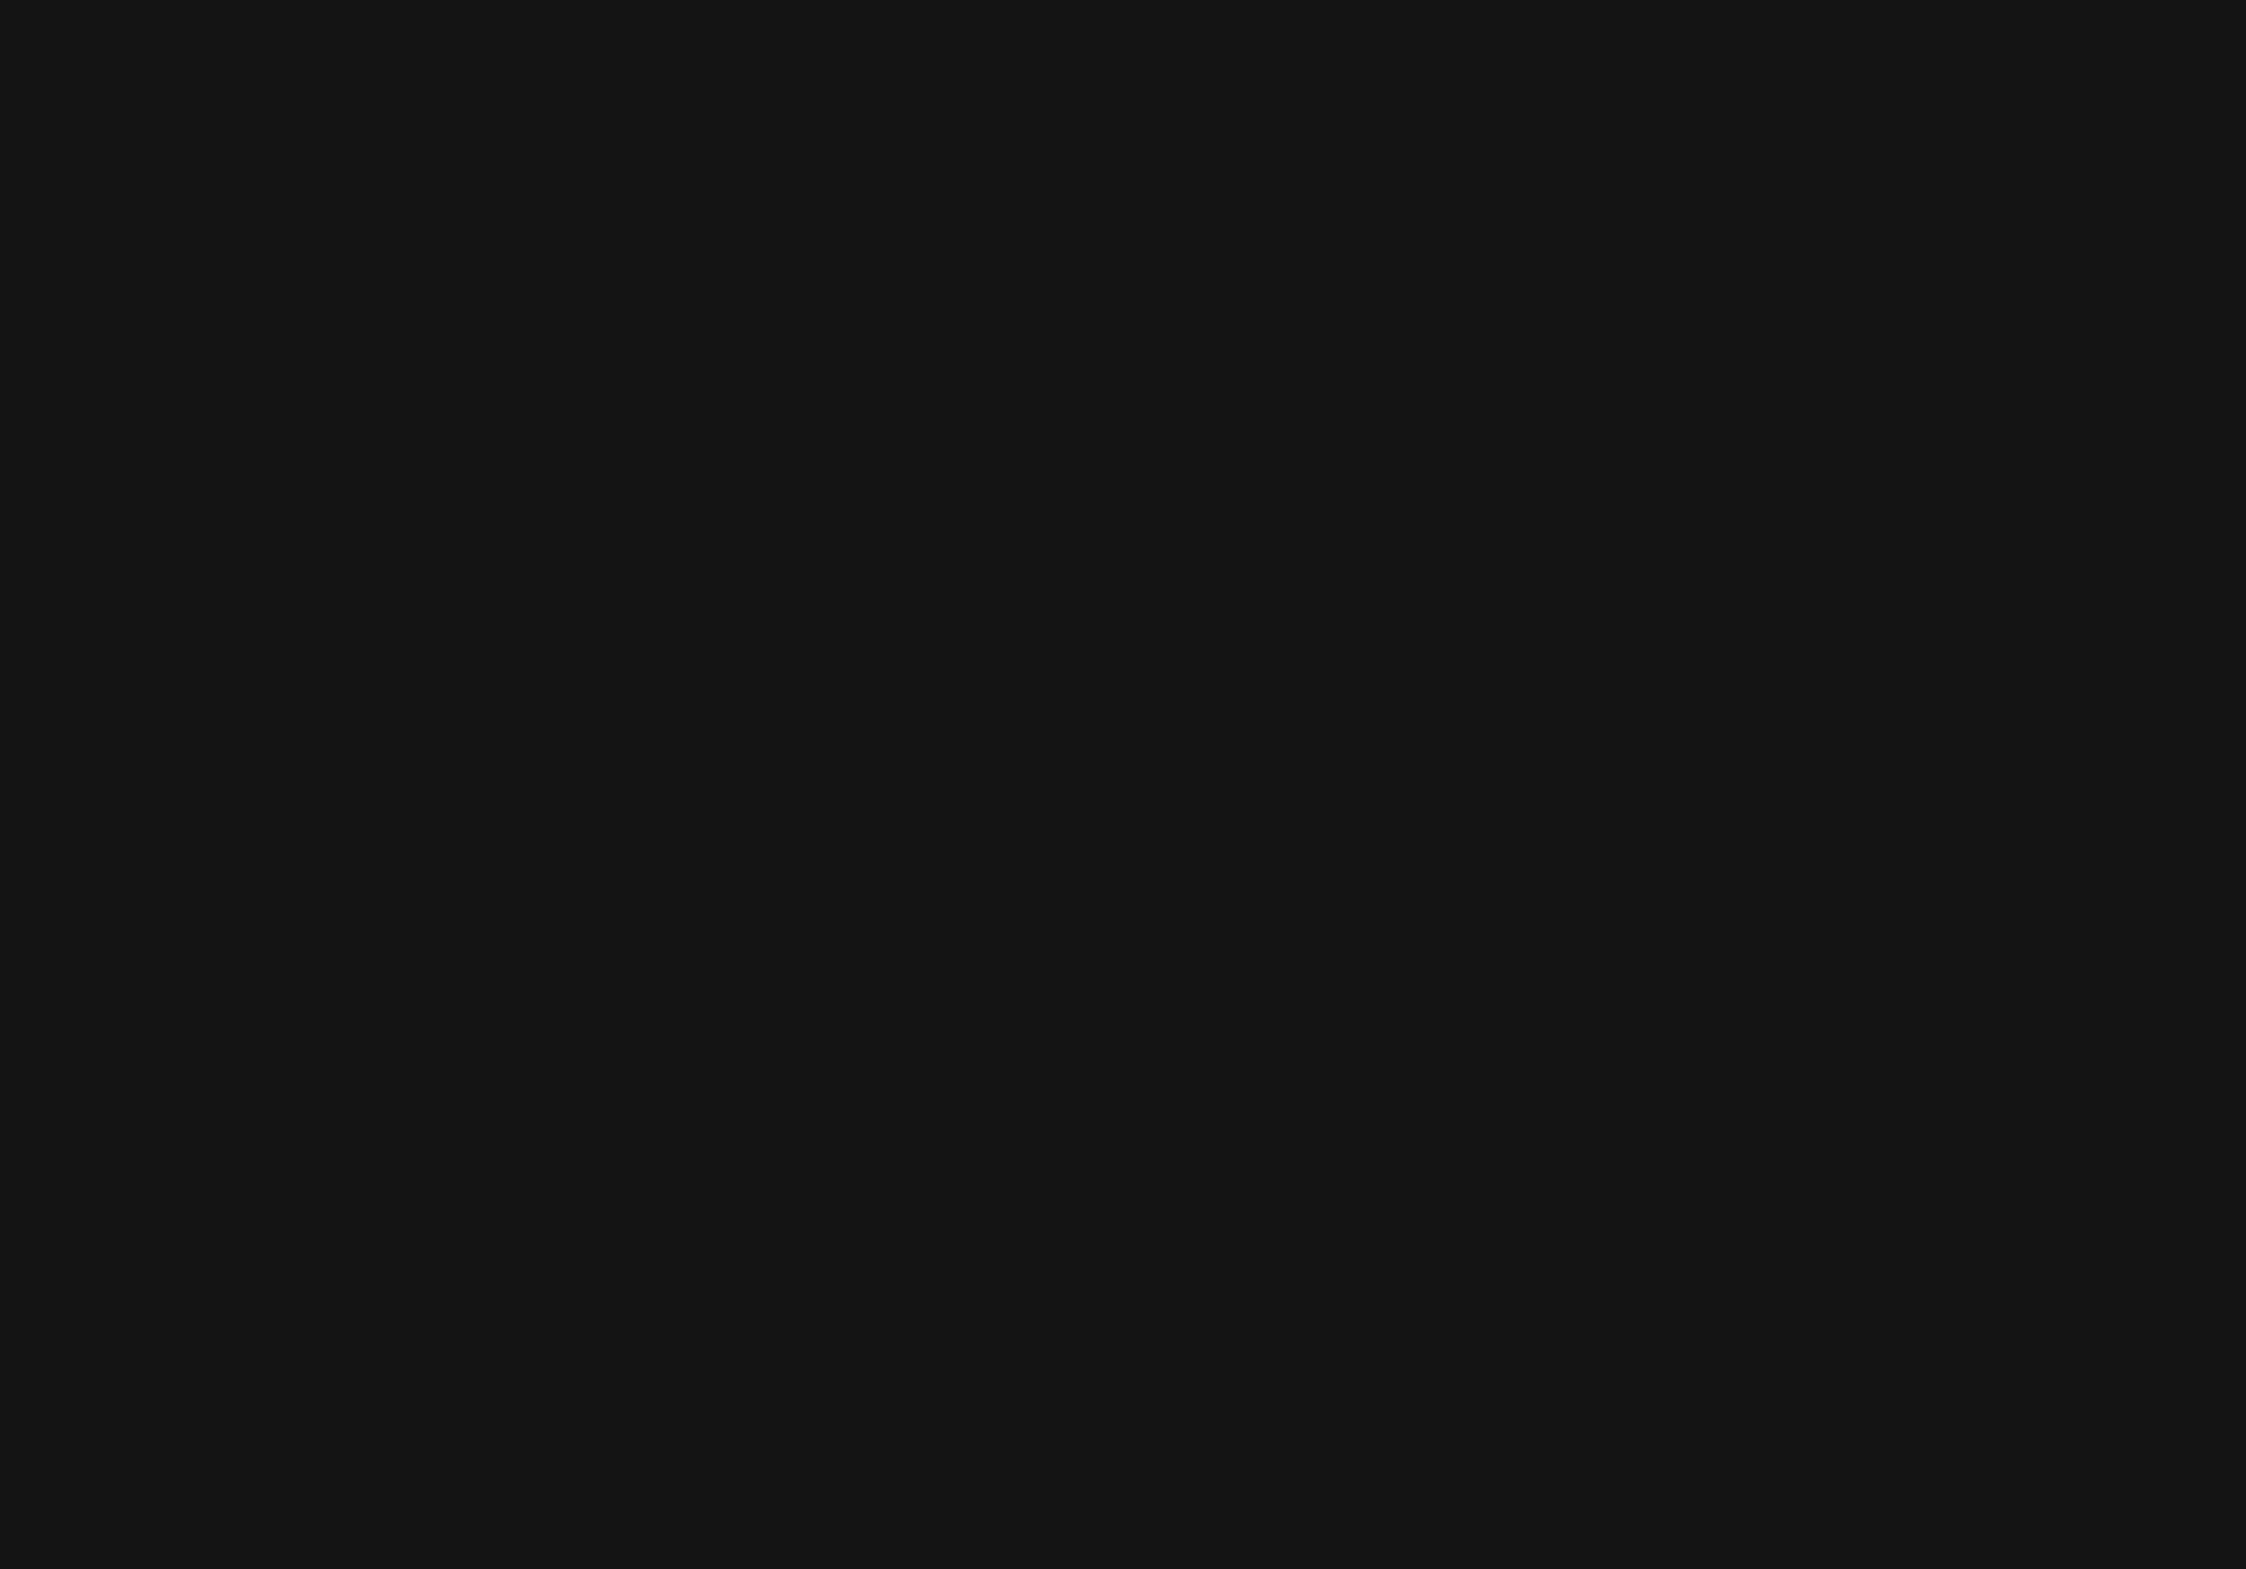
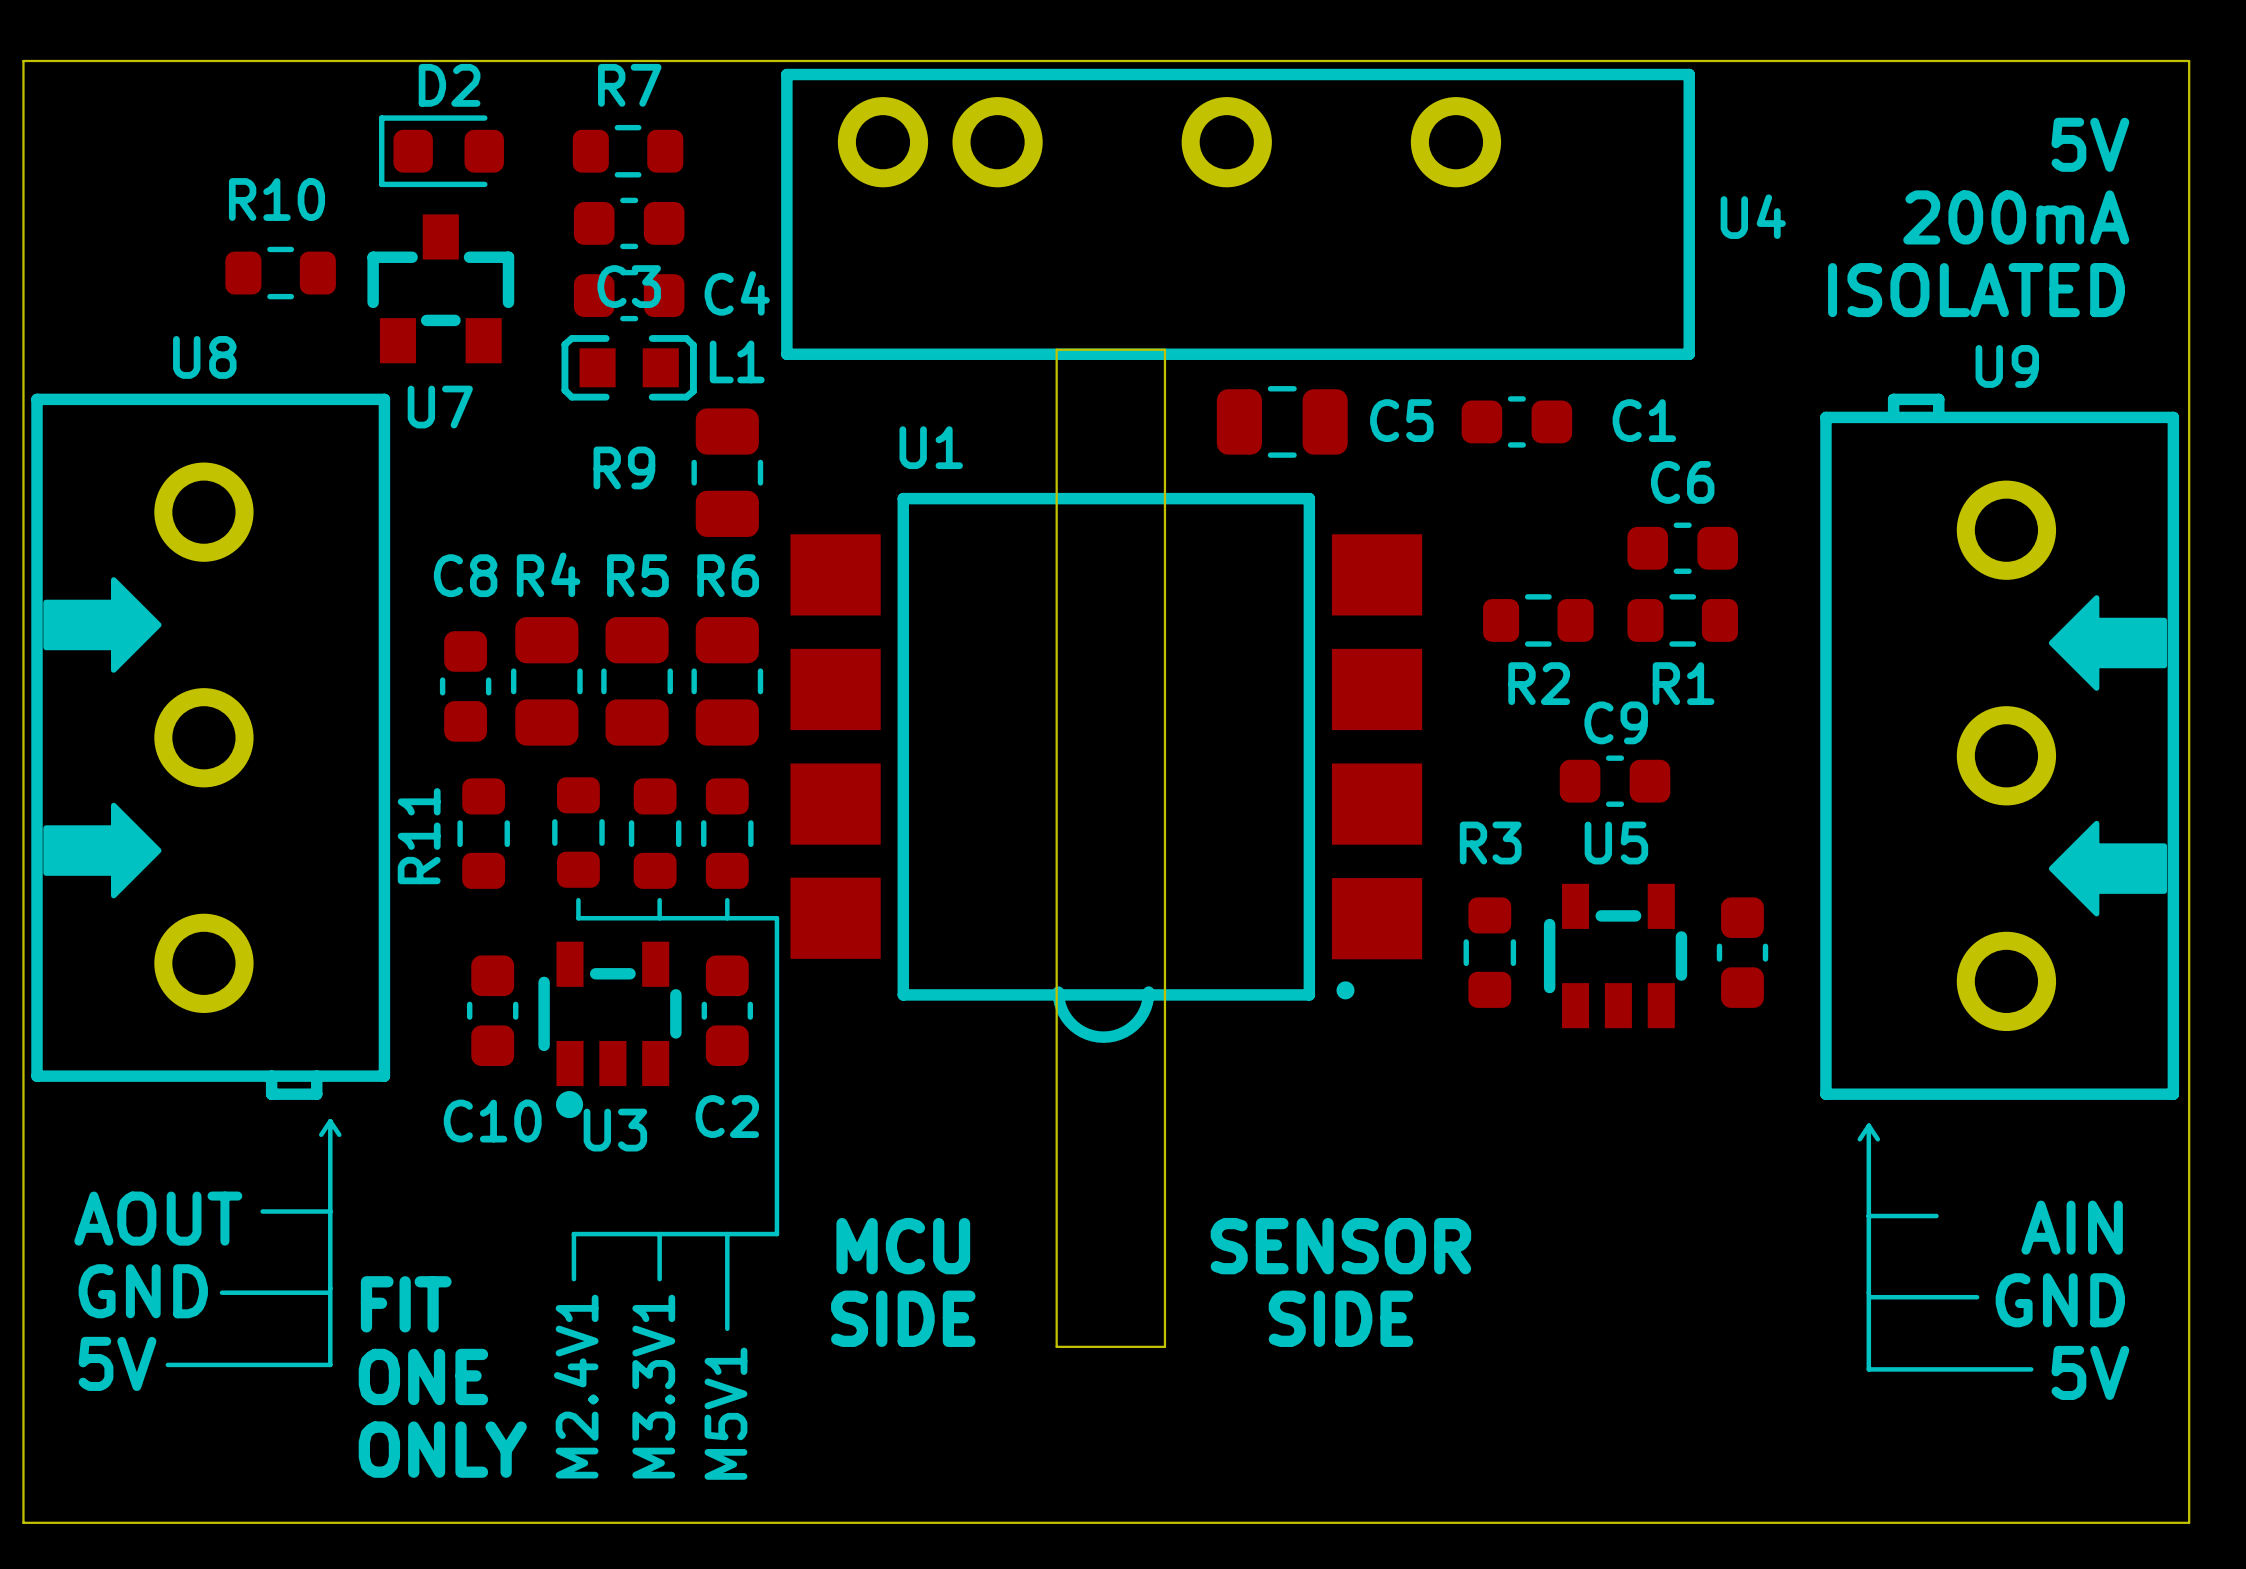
board edge: none -> (23, 60) (2189, 60) (2189, 1522) (23, 1522) (23, 60)
text: none -> 5V (2090, 144)
D2: none -> (441, 151)
R7: none -> (628, 151)
U4: none -> (1238, 214)
text: none -> 200mA (2016, 217)
C3: none -> (629, 223)
R10: none -> (280, 273)
U7: none -> (440, 288)
text: none -> ISOLATED (1976, 290)
C4: none -> (629, 295)
board edge: none -> (1056, 349) (1164, 349) (1164, 1346) (1056, 1346) (1056, 349)
L1: none -> (629, 367)
C5: none -> (1282, 421)
C1: none -> (1516, 421)
R9: none -> (727, 472)
C6: none -> (1682, 548)
R2: none -> (1538, 620)
R1: none -> (1682, 620)
R4: none -> (546, 681)
R5: none -> (637, 681)
R6: none -> (727, 681)
C8: none -> (465, 686)
U8: none -> (210, 746)
U9: none -> (1999, 746)
U1: none -> (1106, 767)
C9: none -> (1615, 781)
M2.4V1: none -> (578, 832)
R11: none -> (483, 833)
M3.3V1: none -> (655, 833)
M5V1: none -> (727, 833)
line: none -> (578, 900) (578, 918) (776, 918) (776, 1234) (573, 1234) (573, 1279)
line: none -> (659, 900) (659, 918)
line: none -> (727, 900) (727, 918)
R3: none -> (1489, 952)
part: none -> (1742, 952)
U5: none -> (1615, 956)
C10: none -> (492, 1010)
C2: none -> (727, 1010)
U3: none -> (609, 1029)
line: none -> (330, 1121) (321, 1134)
line: none -> (330, 1121) (339, 1134)
line: none -> (330, 1121) (330, 1364) (167, 1364)
line: none -> (1868, 1125) (1859, 1139)
line: none -> (1868, 1125) (1868, 1369) (2031, 1369)
line: none -> (1868, 1125) (1877, 1139)
line: none -> (262, 1211) (330, 1211)
line: none -> (1868, 1216) (1936, 1216)
text: none -> AOUT (158, 1218)
text: none -> AIN (2072, 1227)
line: none -> (659, 1234) (659, 1279)
line: none -> (727, 1234) (727, 1328)
text: none -> MCU (903, 1246)
text: none -> SENSOR (1340, 1246)
text: none -> GND (143, 1291)
line: none -> (221, 1292) (328, 1292)
line: none -> (1871, 1297) (1977, 1297)
text: none -> GND (2060, 1300)
text: none -> FIT (406, 1304)
text: none -> SIDE (903, 1318)
text: none -> SIDE (1340, 1318)
text: none -> 5V (117, 1363)
text: none -> 5V (2090, 1372)
text: none -> ONE (423, 1376)
text: none -> ONLY (442, 1449)

